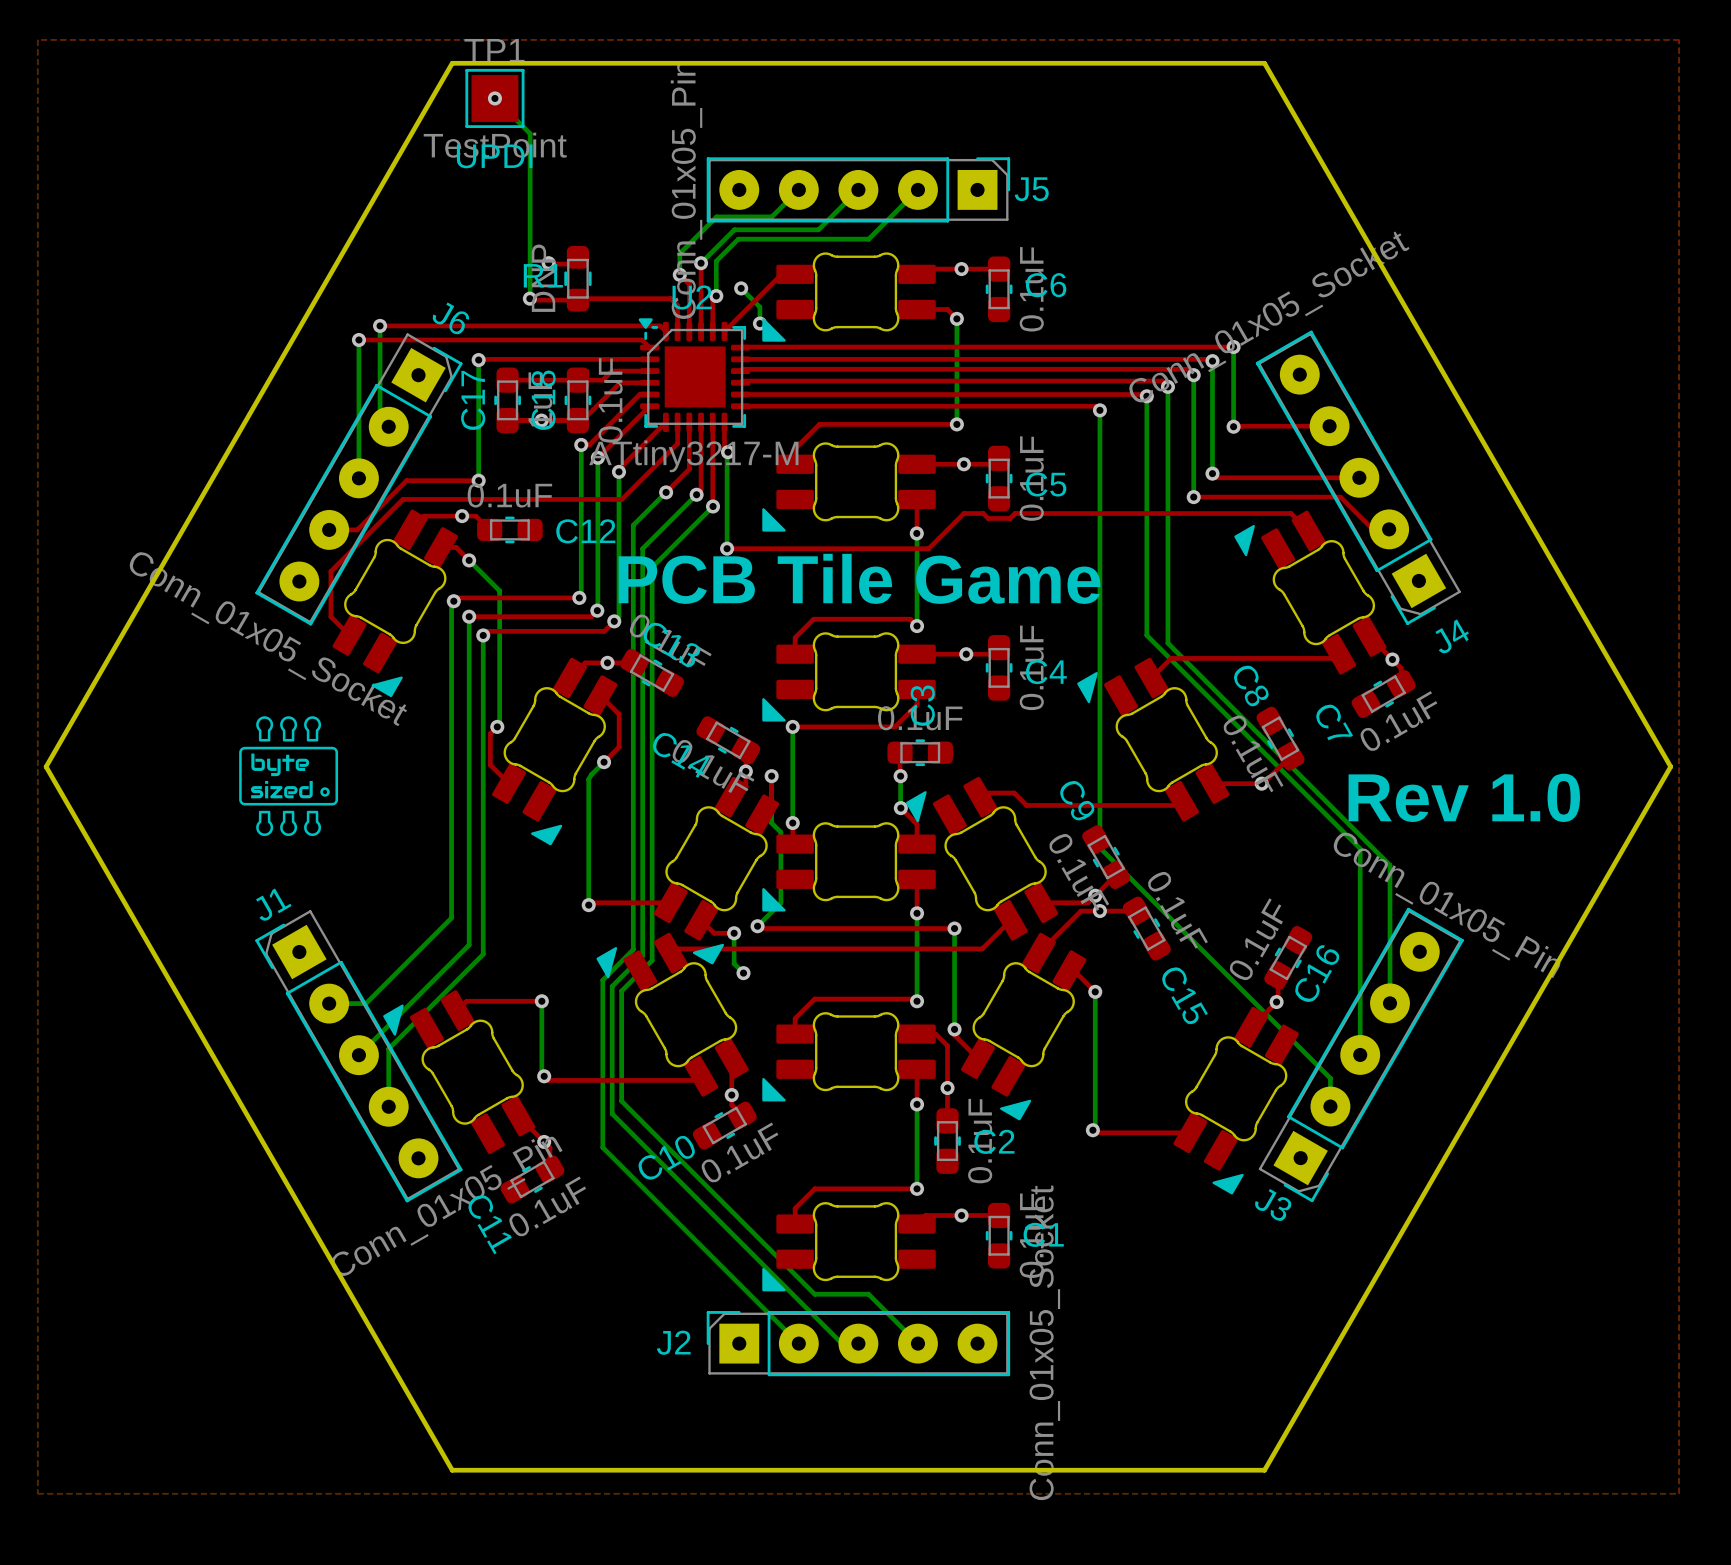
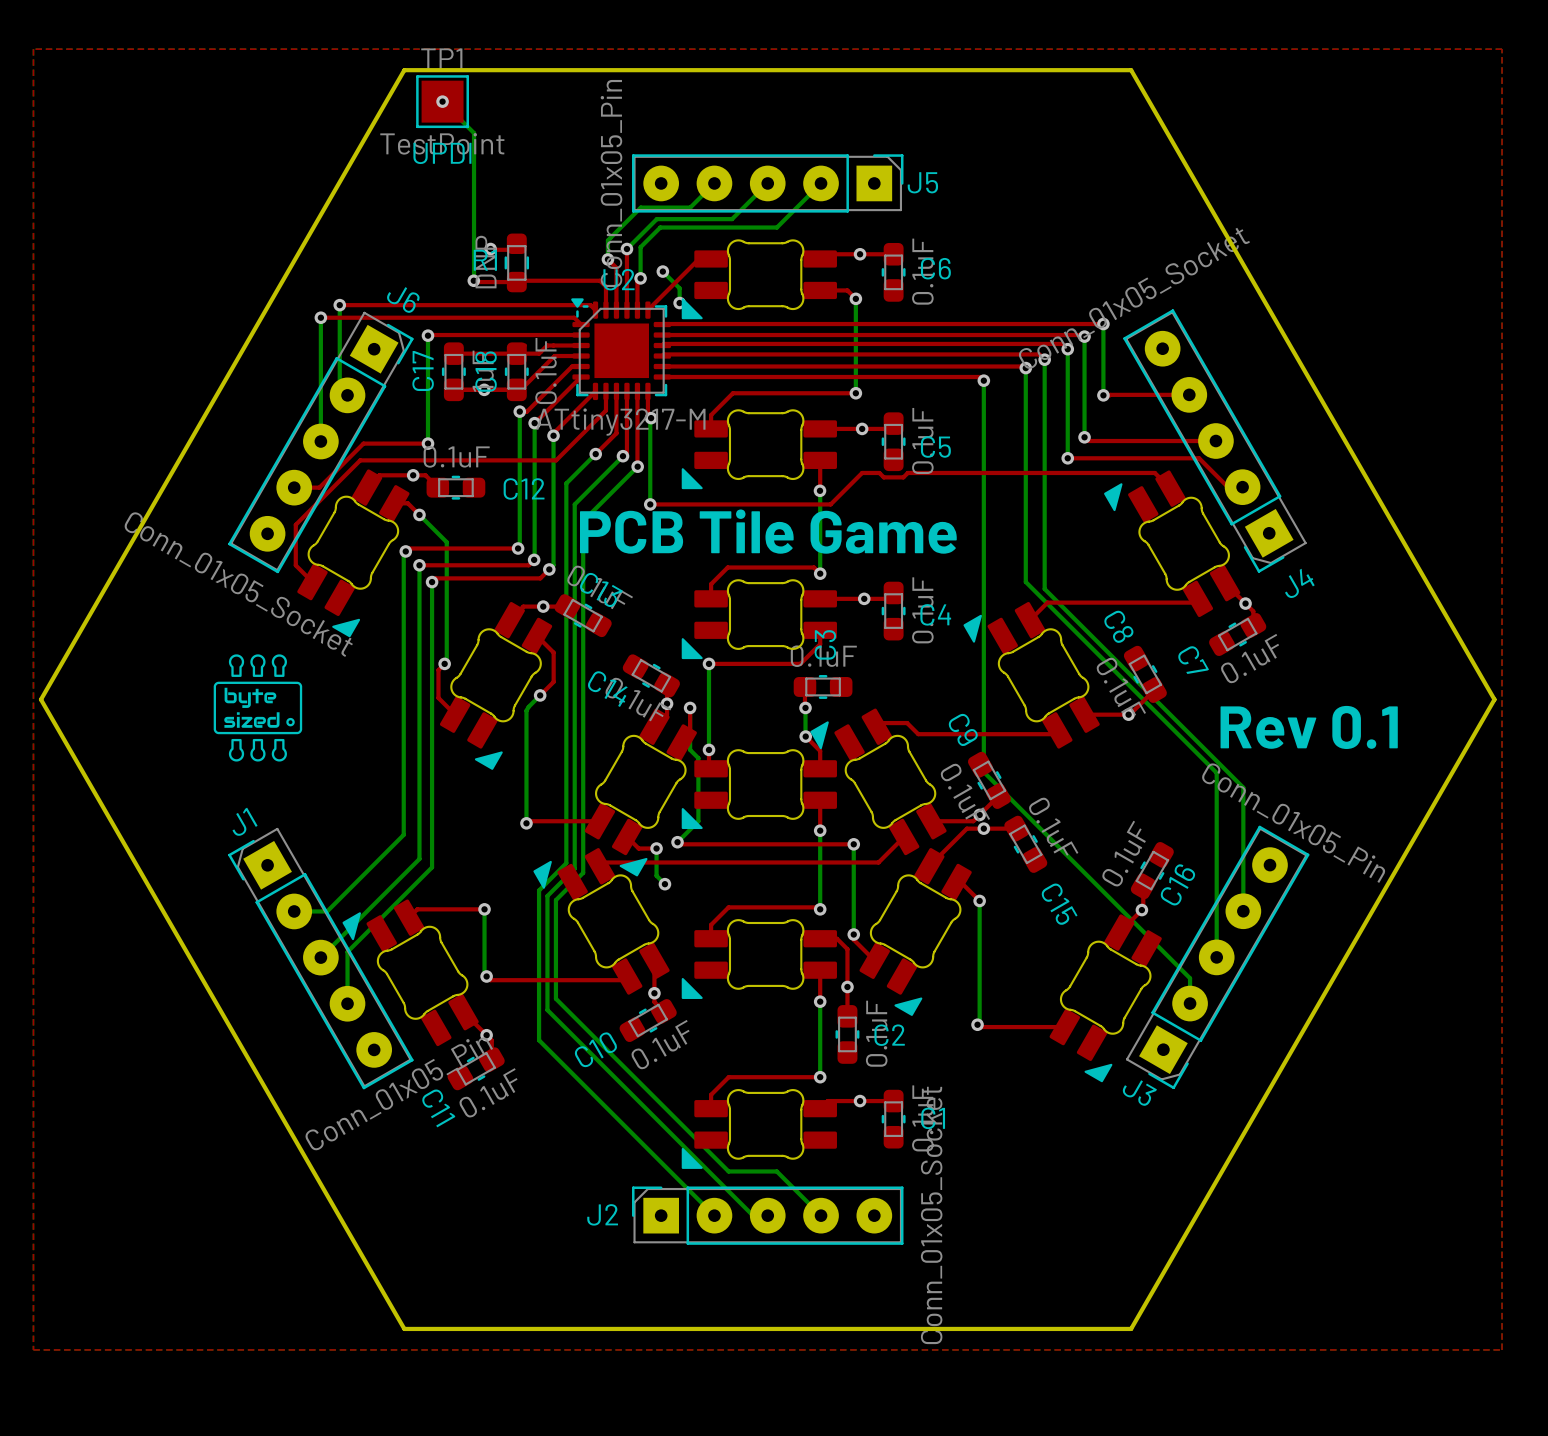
text: Rev 1.0 (1464, 797) -> Rev 0.1 (1309, 727)

